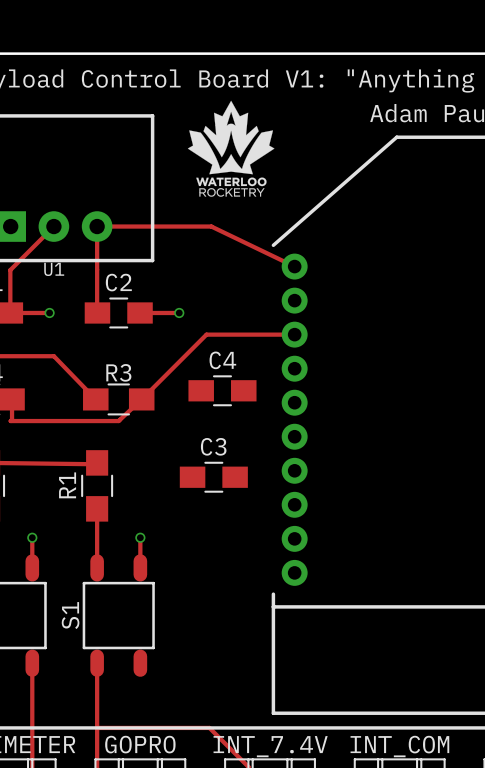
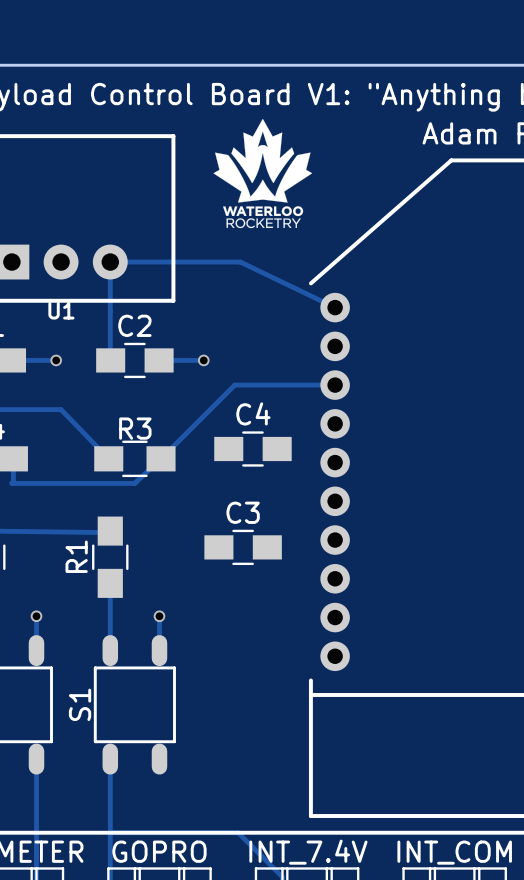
track: (53, 226) (10, 270) (10, 312) -> none

